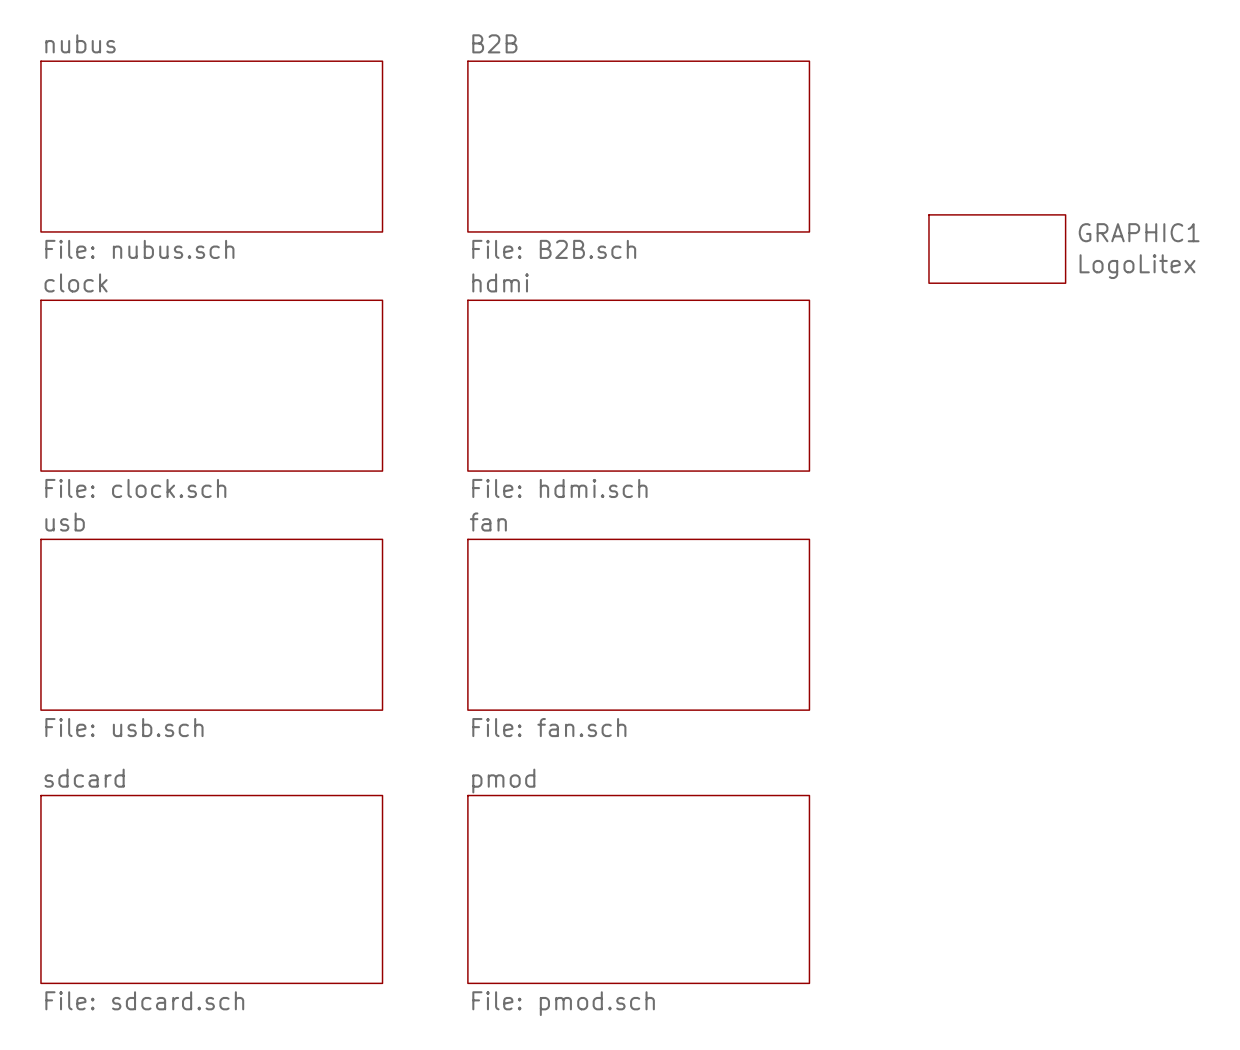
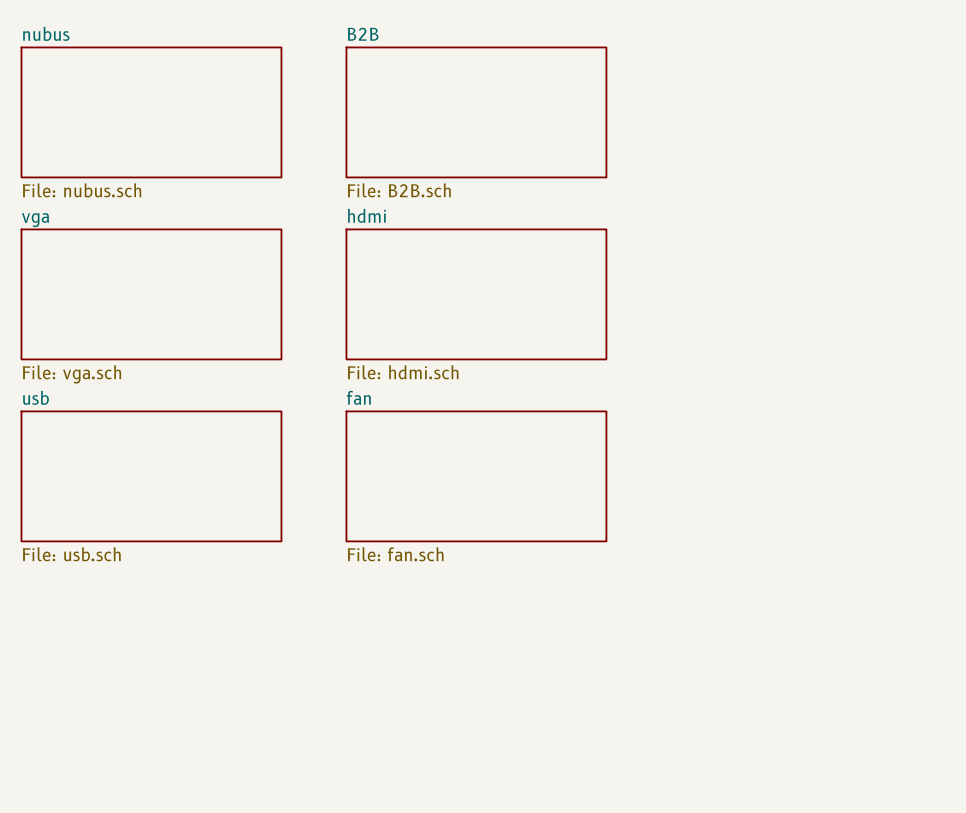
GRAPHIC1: LogoLitex (997, 249) -> none
sheet clock name: clock (76, 282) -> vga (35, 220)
sheet clock value: File: clock.sch (135, 488) -> File: vga.sch (71, 374)
sheet sdcard: File: sdcard.sch (211, 889) -> none
sheet pmod: File: pmod.sch (638, 889) -> none

